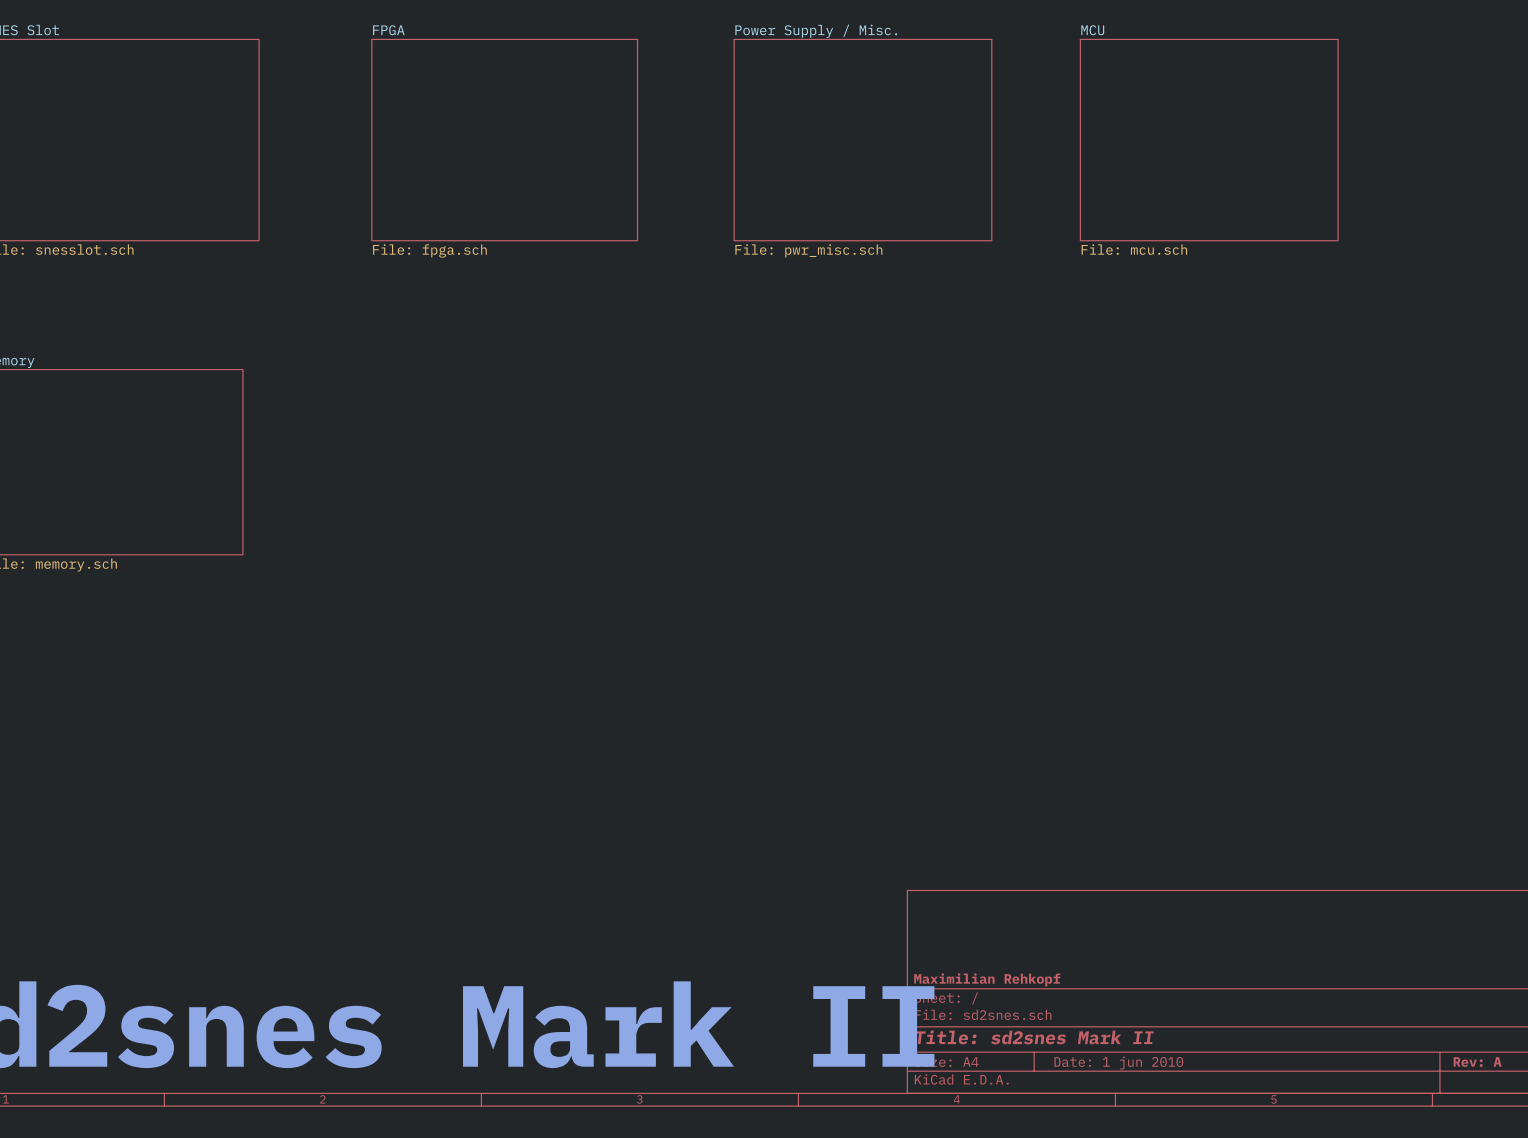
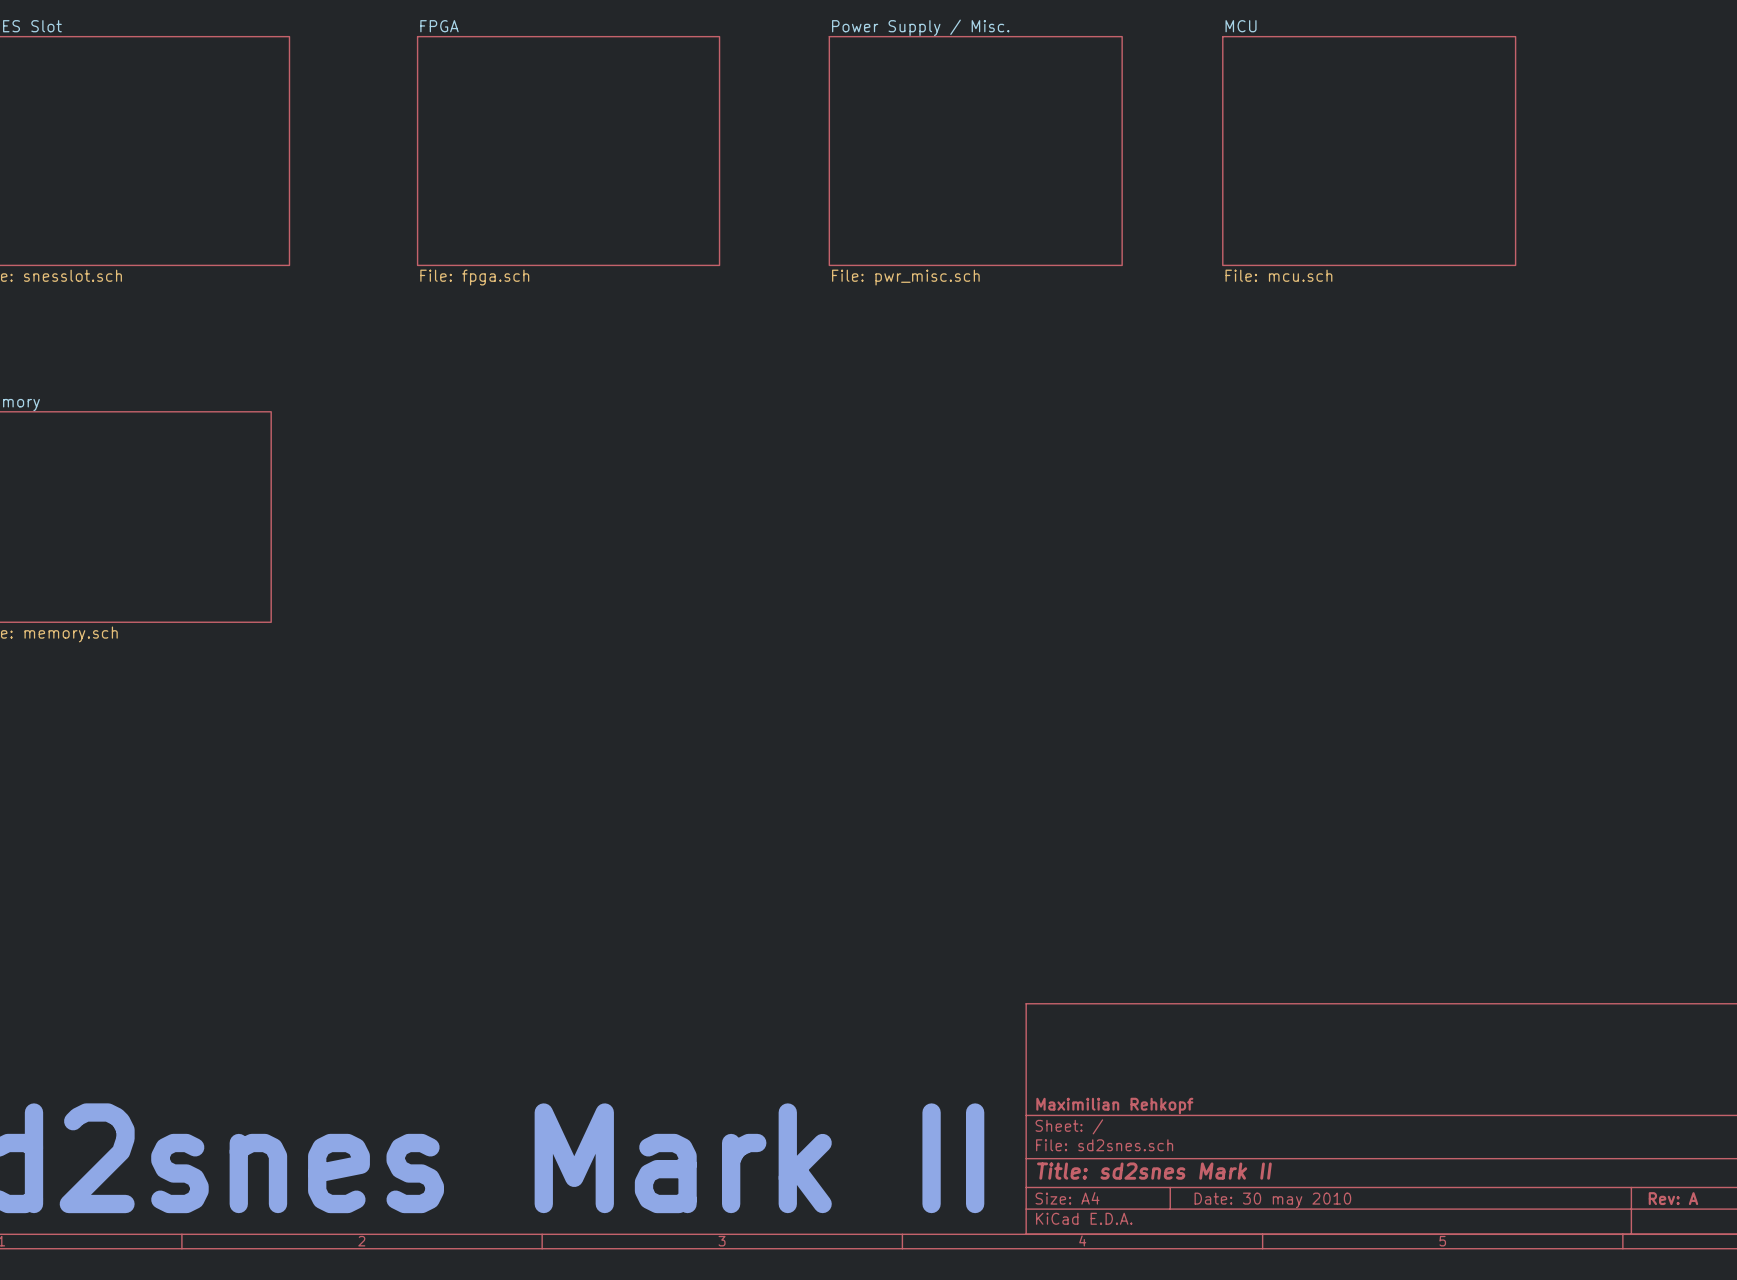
title block: Date: 1 jun 2010 (1118, 1062) -> Date: 30 may 2010 (1272, 1200)

